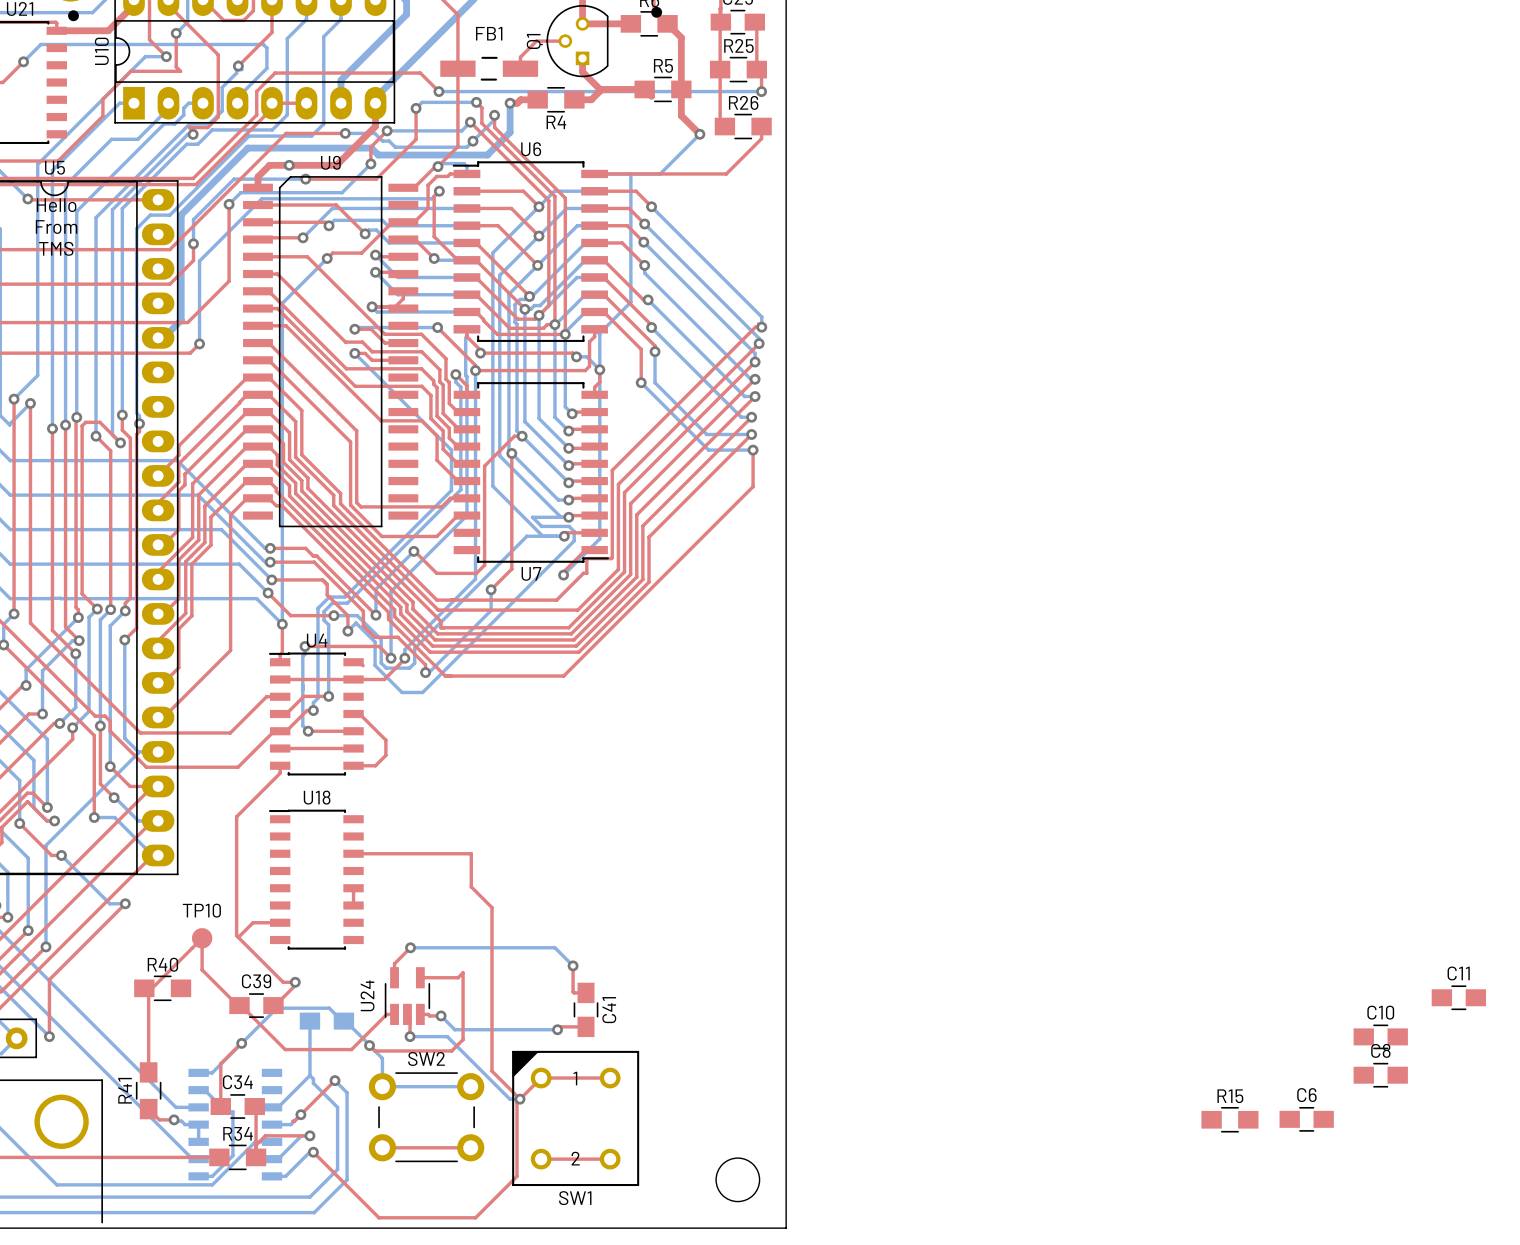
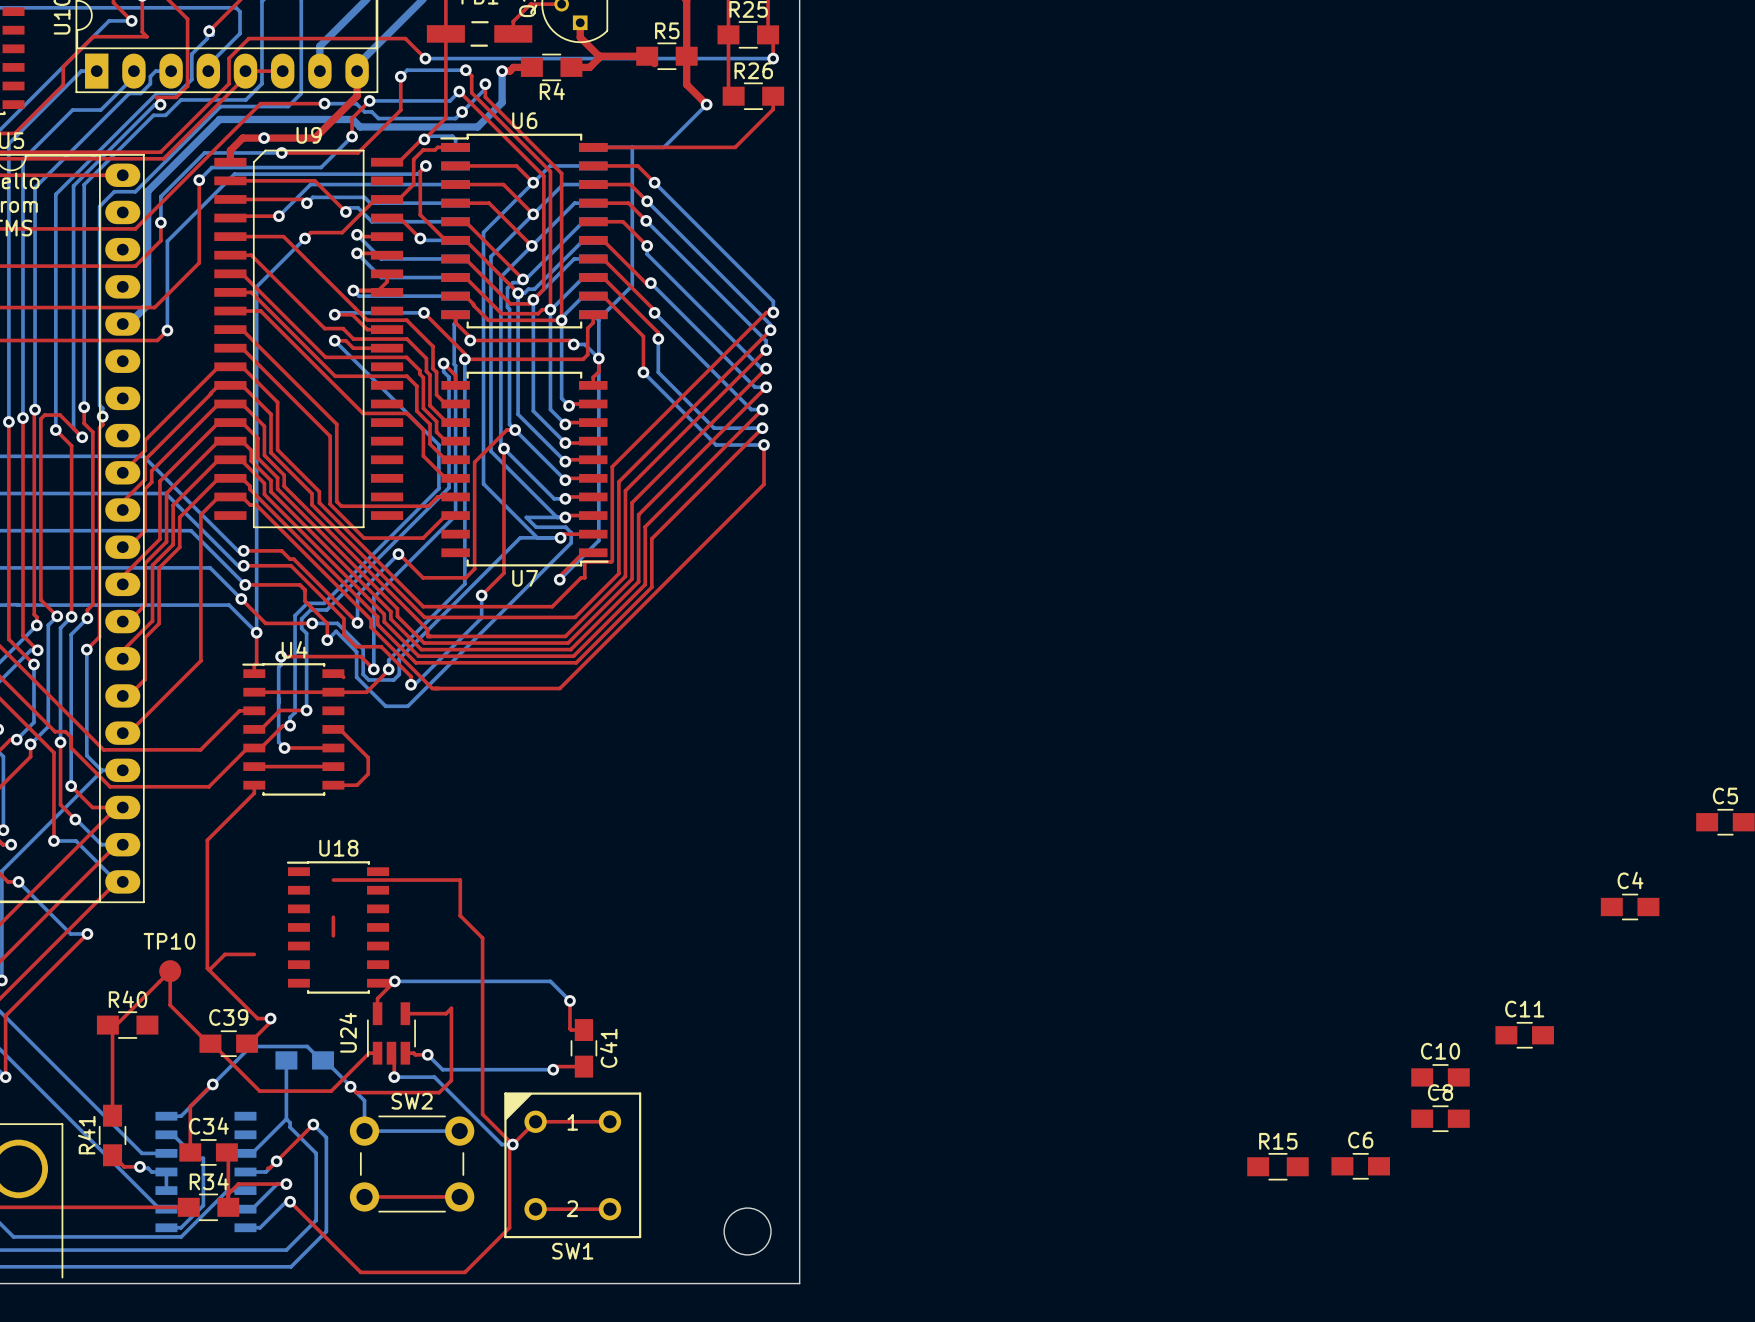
U18 footprint: [268, 809, 364, 950] -> [286, 861, 389, 994]

